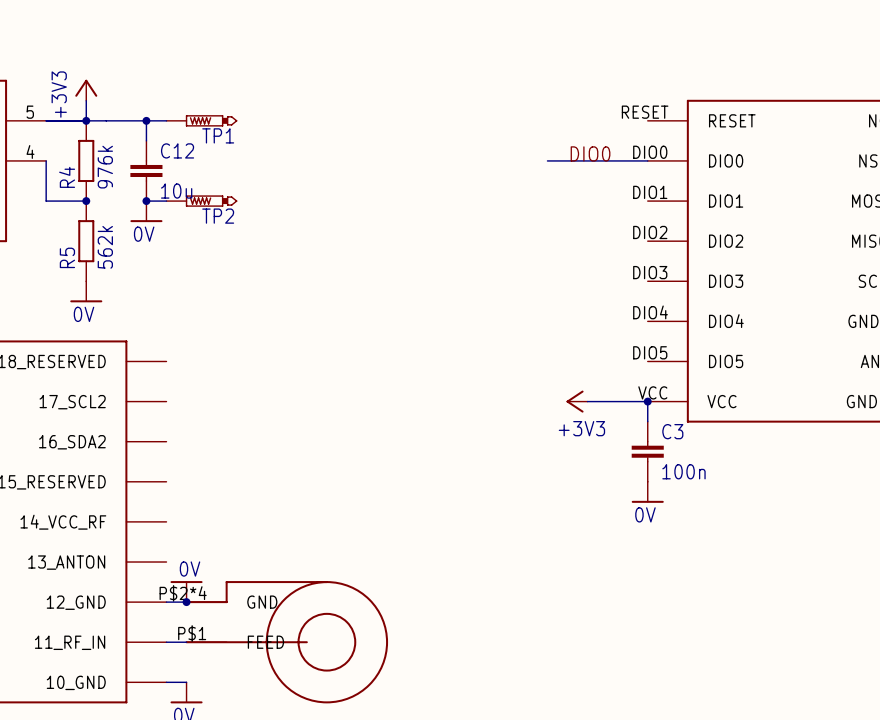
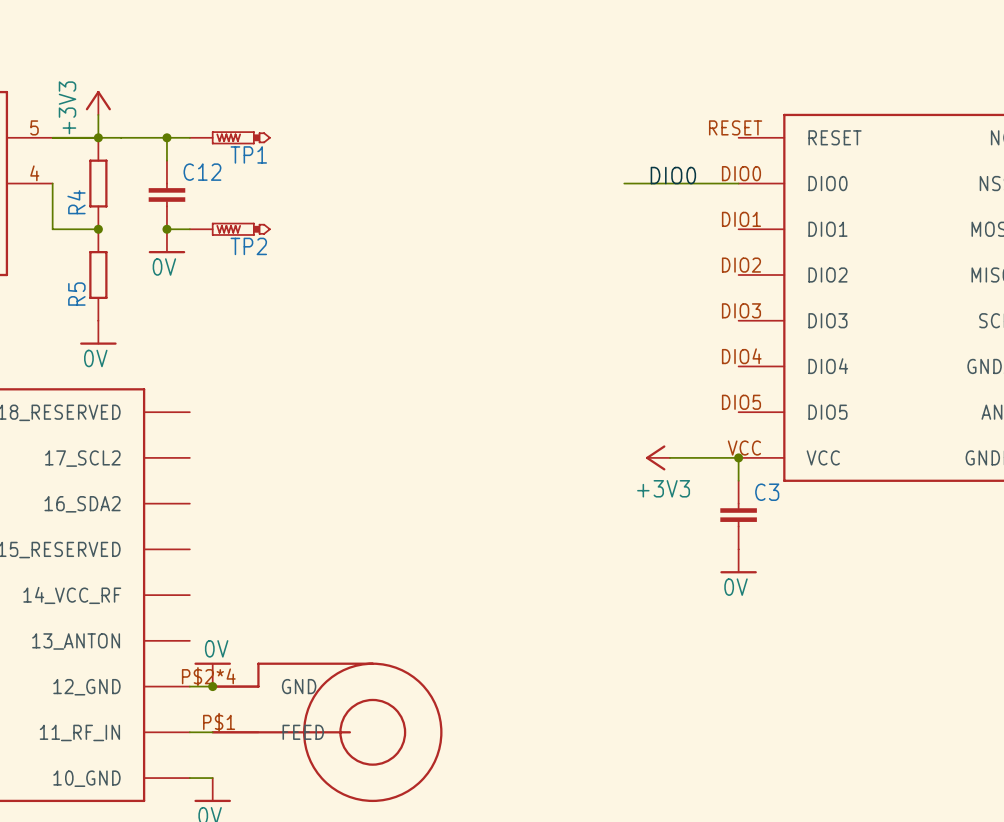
R4 value: 976k (105, 167) -> none
C12 value: 10u (176, 191) -> none
R5 value: 562k (105, 247) -> none
C3 value: 100n (683, 471) -> none

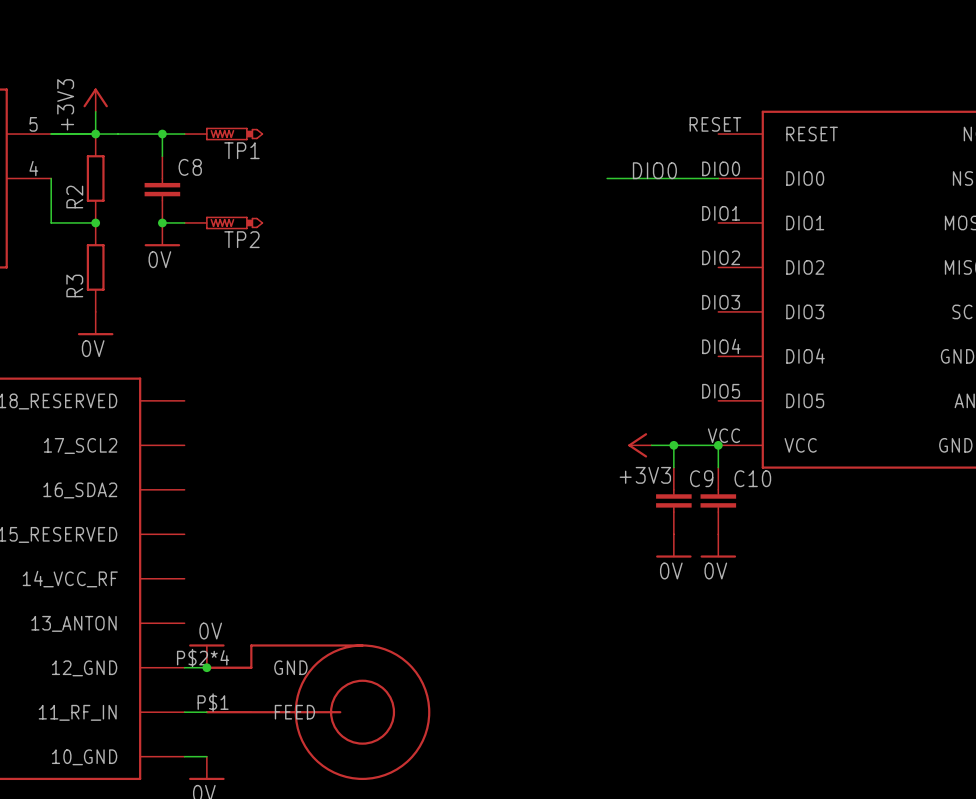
C12 name: C12 (202, 172) -> C8 (190, 167)
R4 name: R4 (76, 202) -> R2 (74, 197)
R5 name: R5 (76, 294) -> R3 (74, 285)
wire: none -> (673, 445) (673, 467)
junction: none -> (673, 445)
C3 name: C3 (767, 492) -> C10 (752, 478)
C9: none -> (673, 500)
power symbol: none -> 0V (673, 545)

